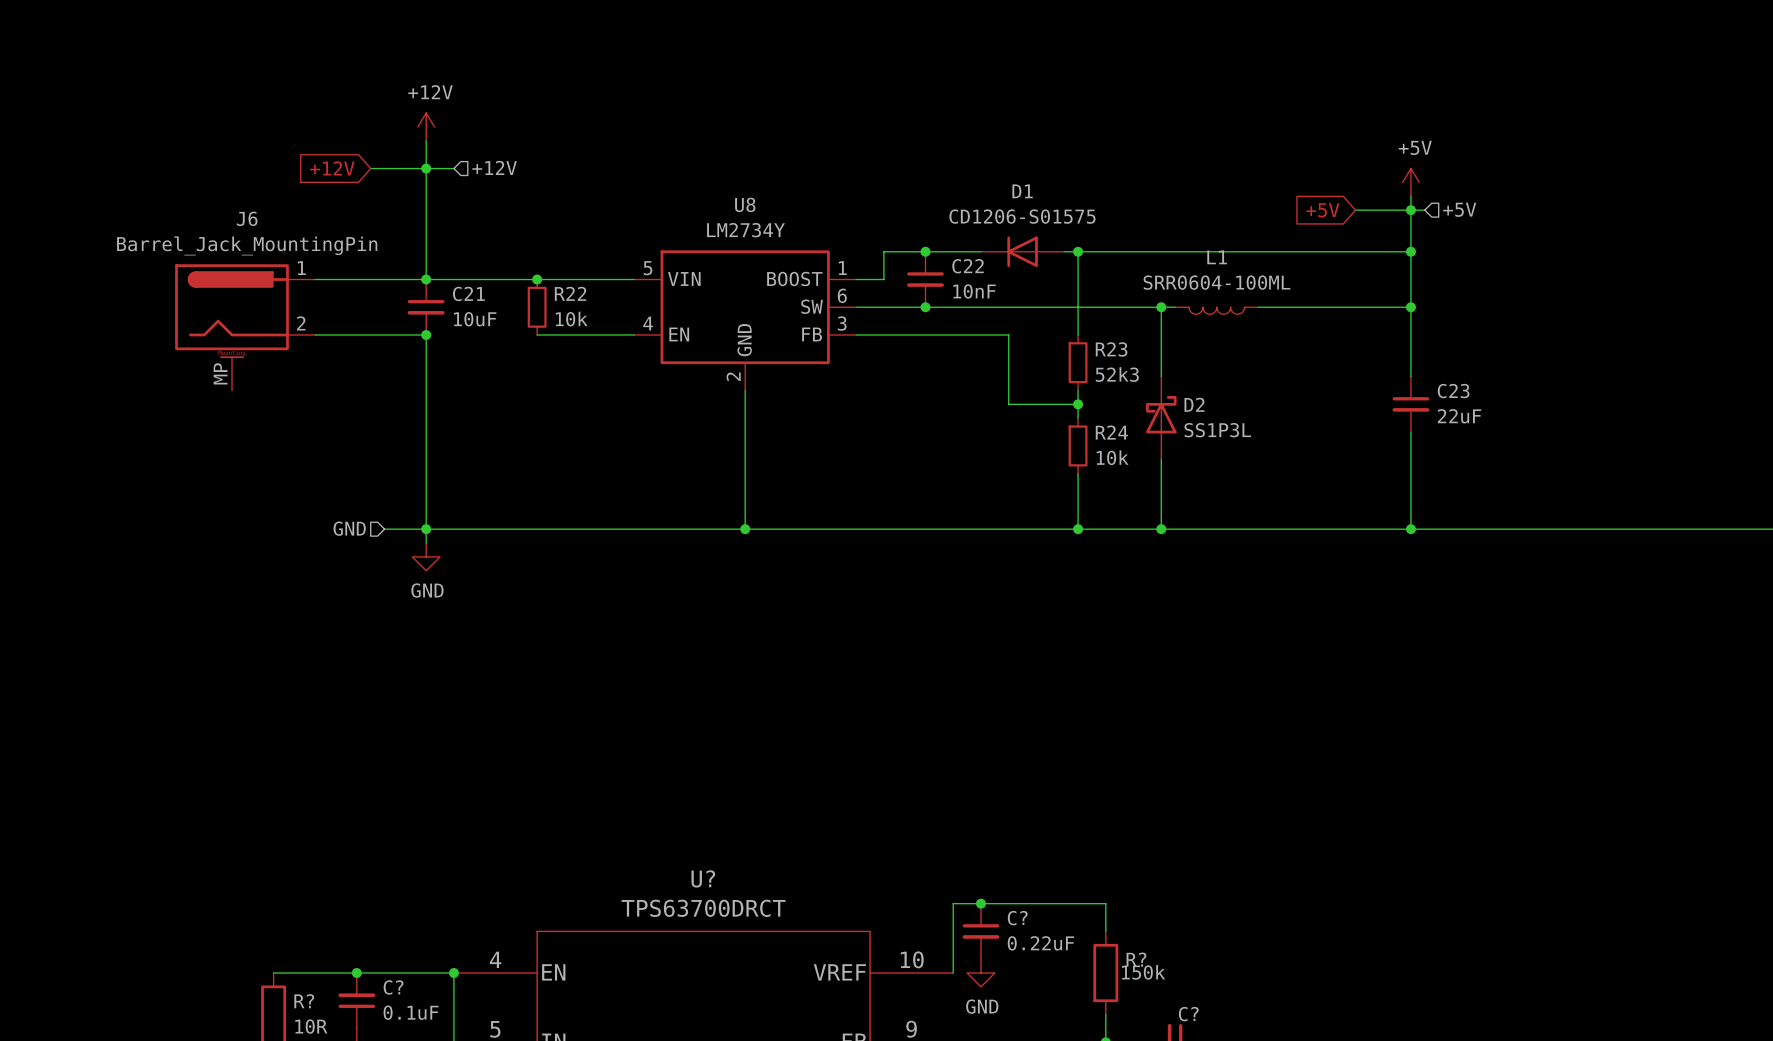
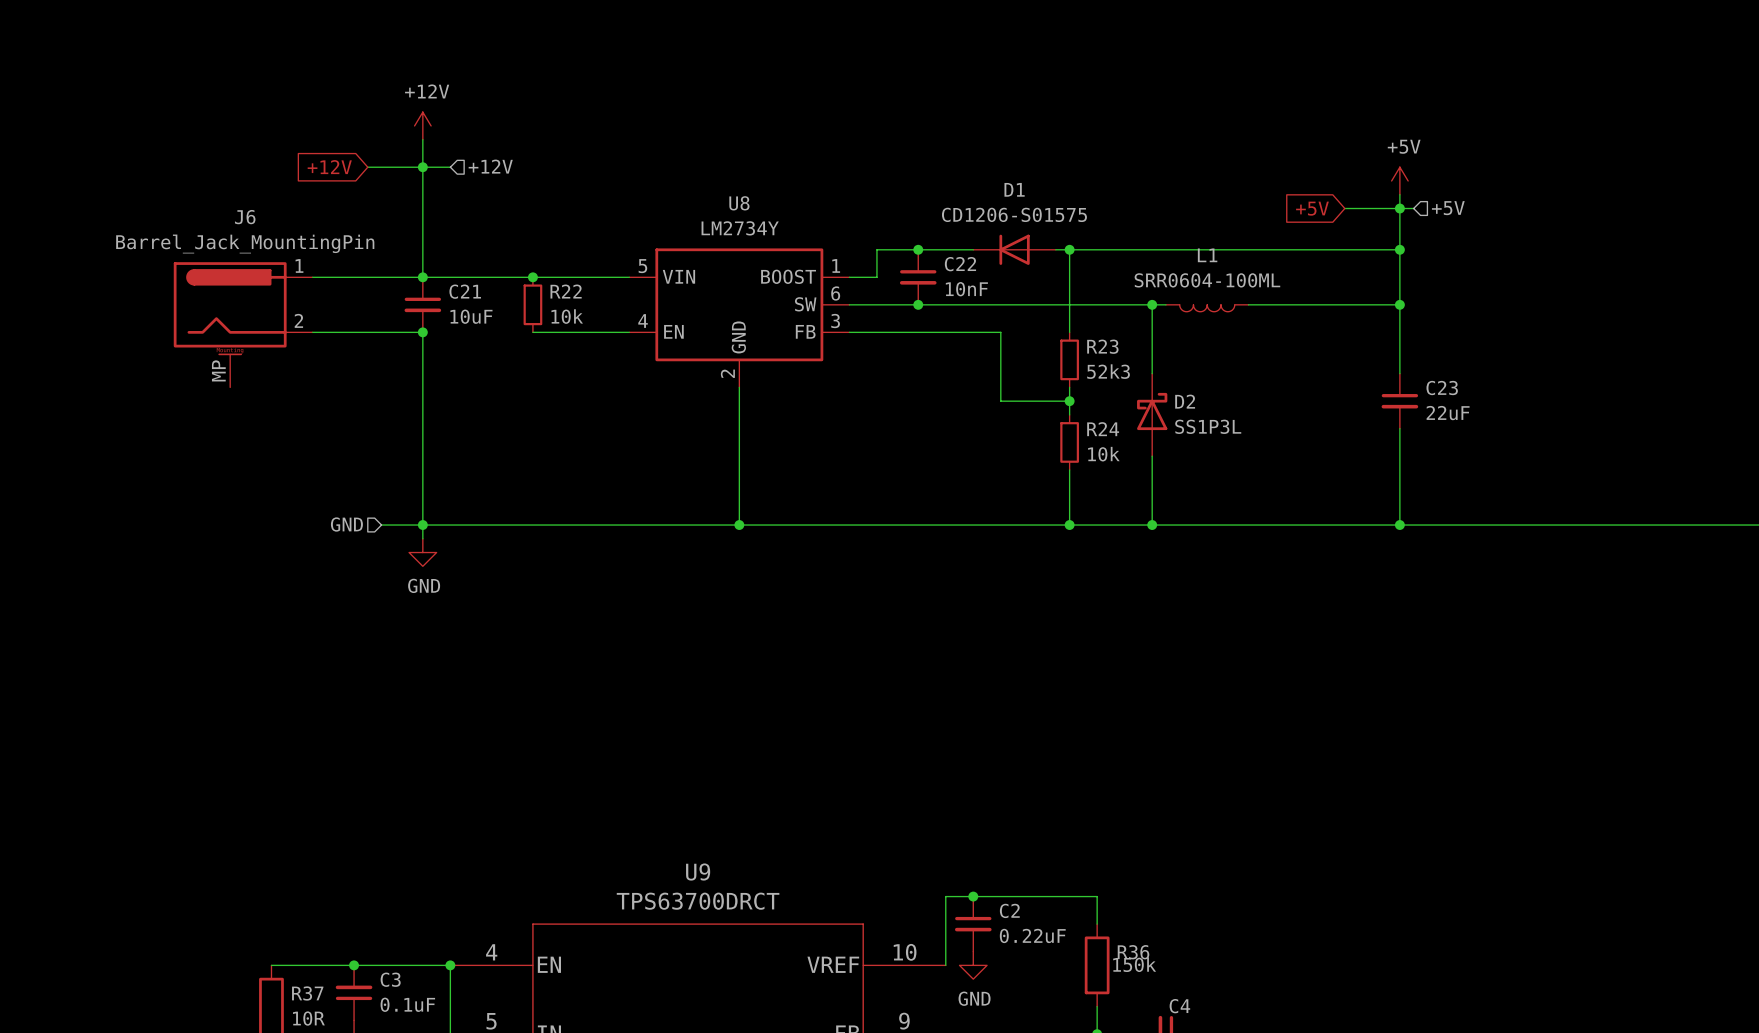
U? name: U? (703, 878) -> U9 (698, 872)
C? name: C? (1017, 918) -> C2 (1009, 910)
R? name: R? (1136, 959) -> R36 (1133, 952)
C? name: C? (393, 987) -> C3 (390, 979)
R? name: R? (304, 1001) -> R37 (307, 993)
C? name: C? (1188, 1014) -> C4 (1179, 1006)

